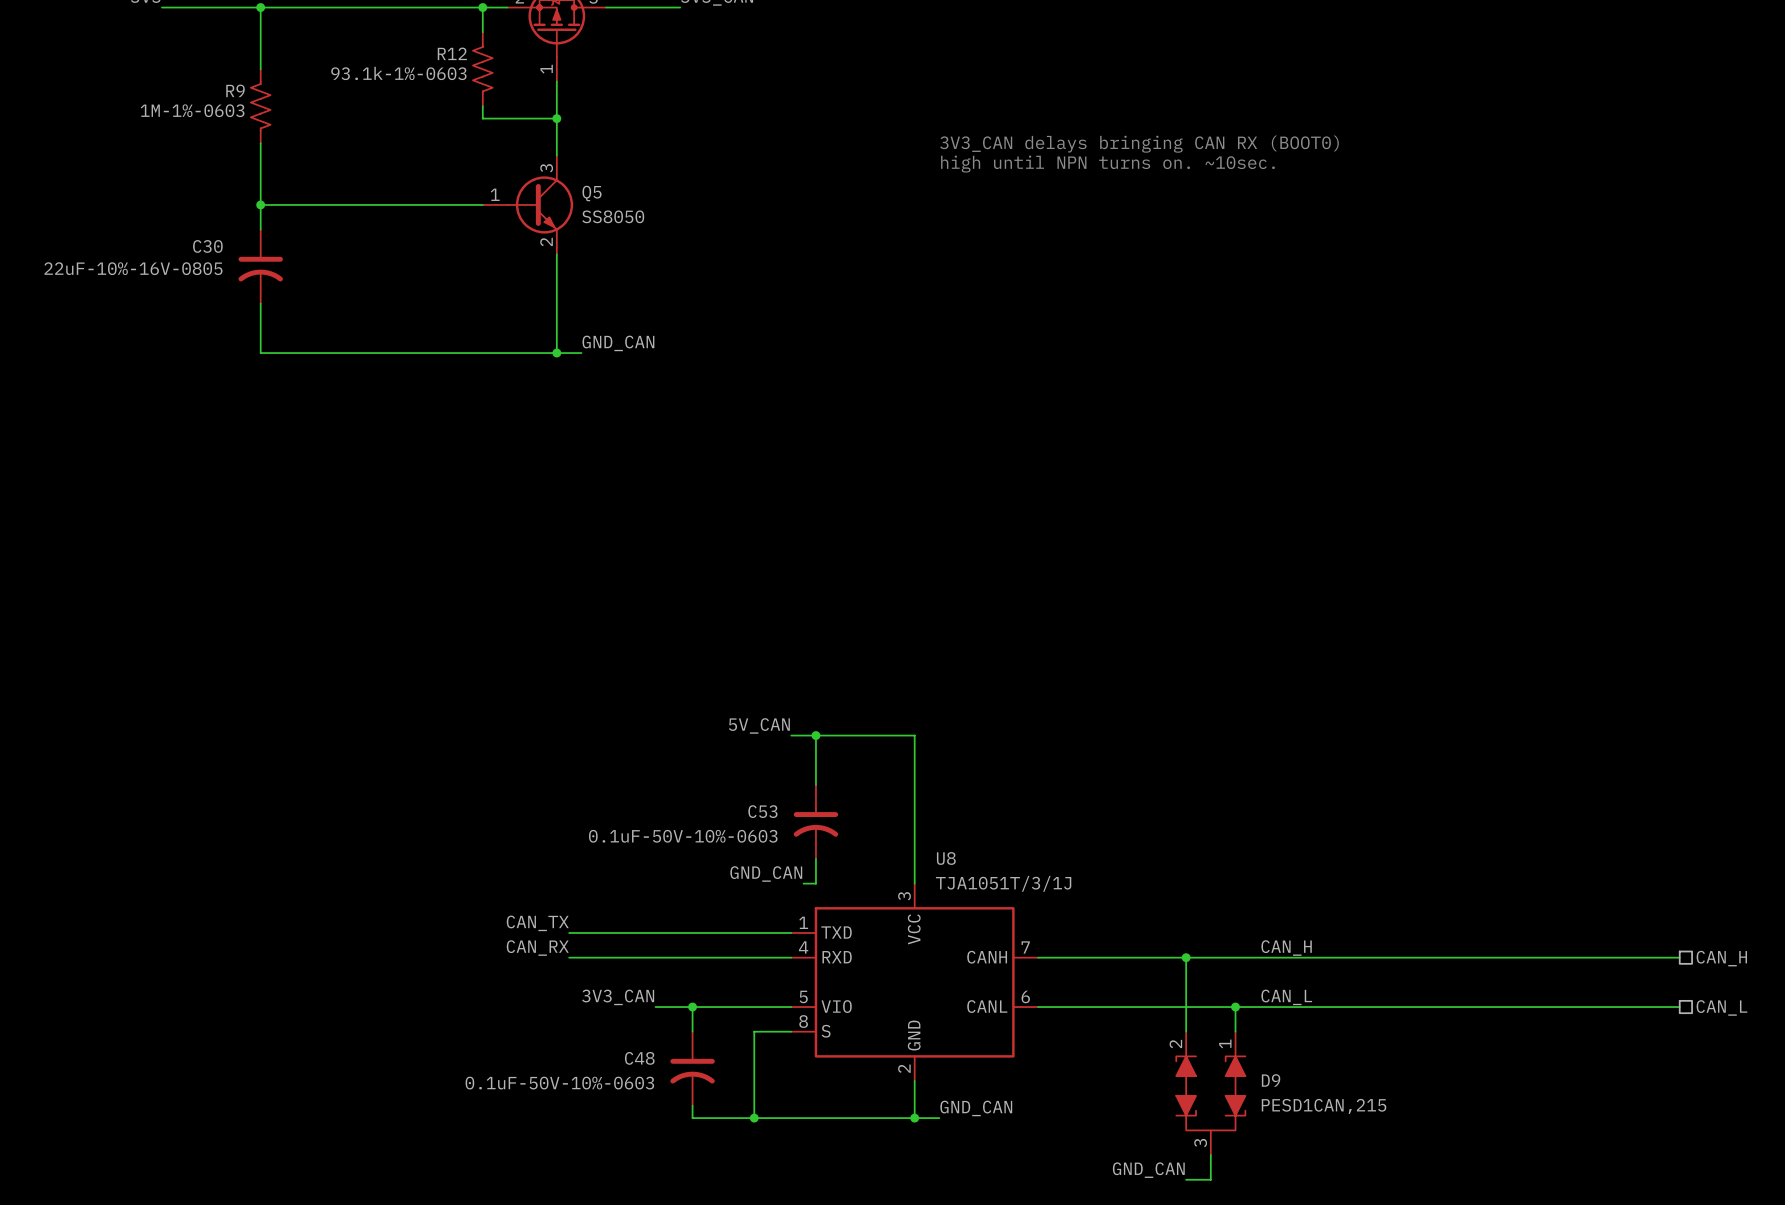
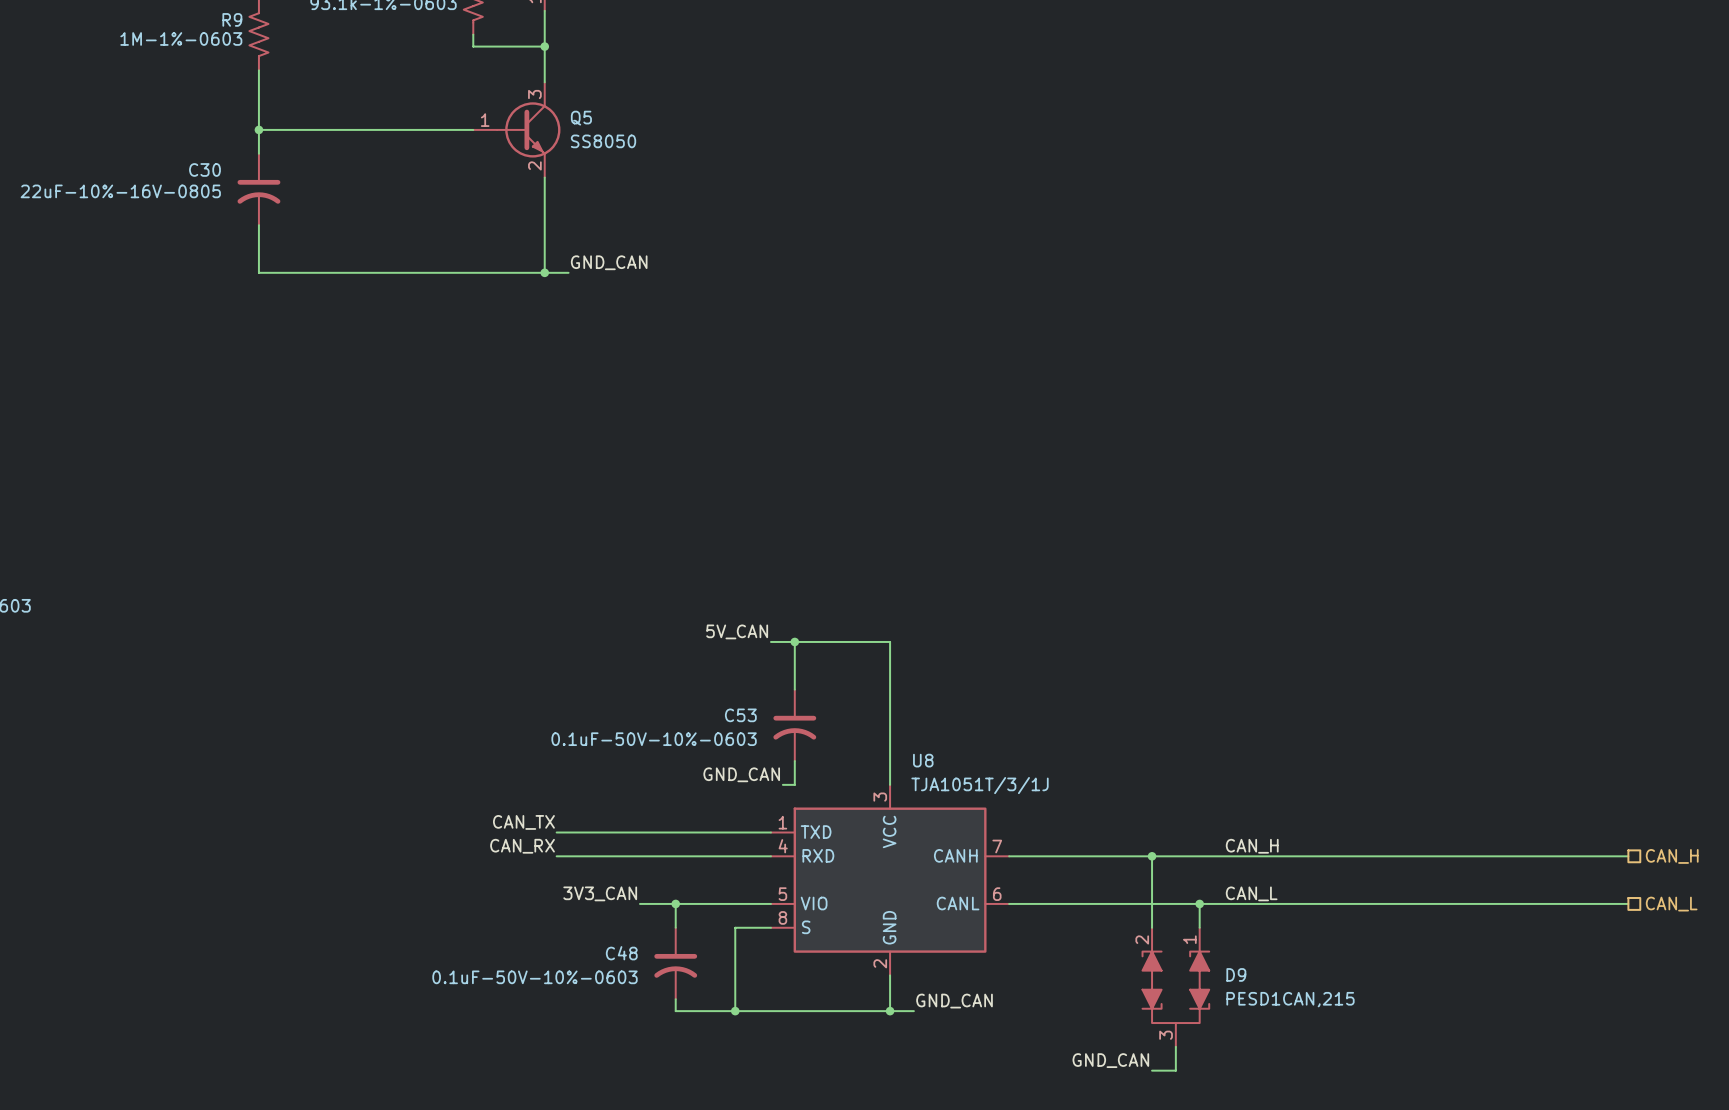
text: 3V3_CAN delays bringing CAN RX (BOOT0) (1139, 144) -> none
text: high until NPN turns on. ~10sec. (1107, 164) -> none

